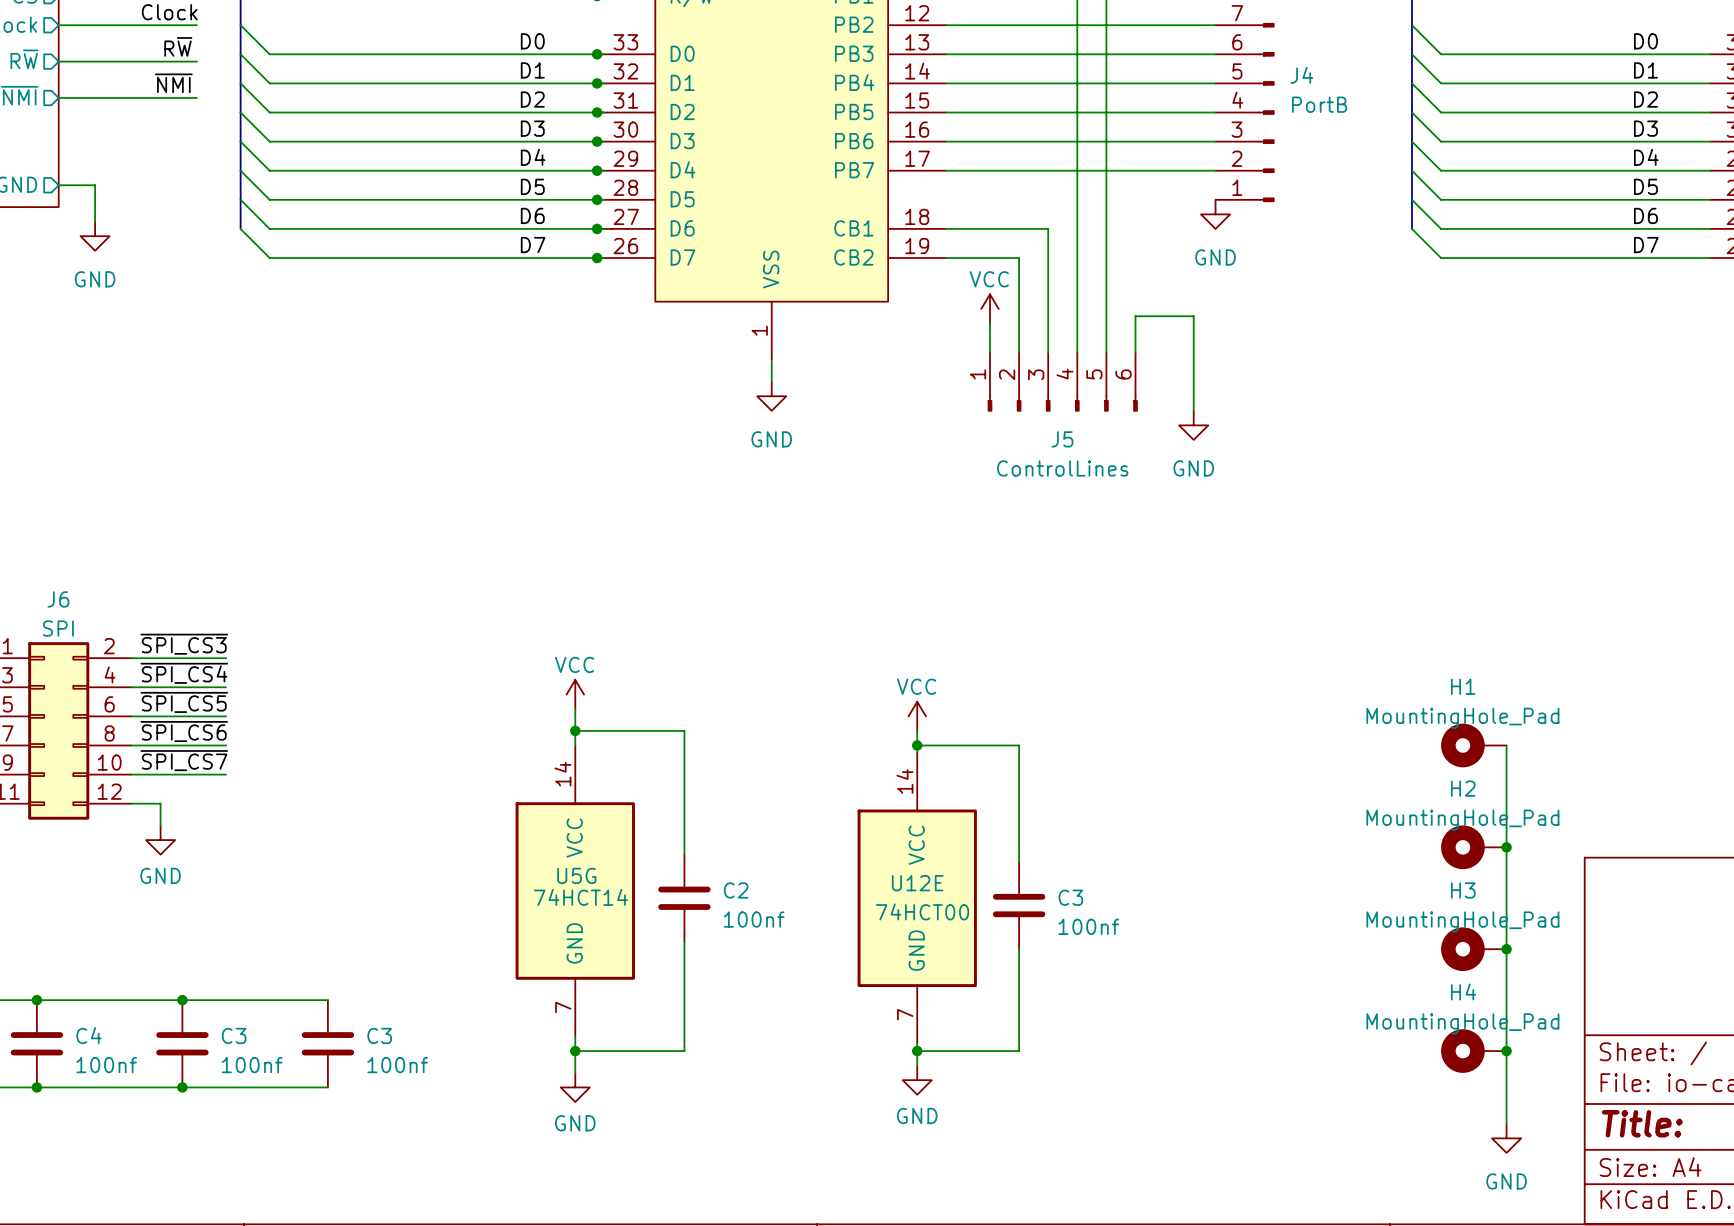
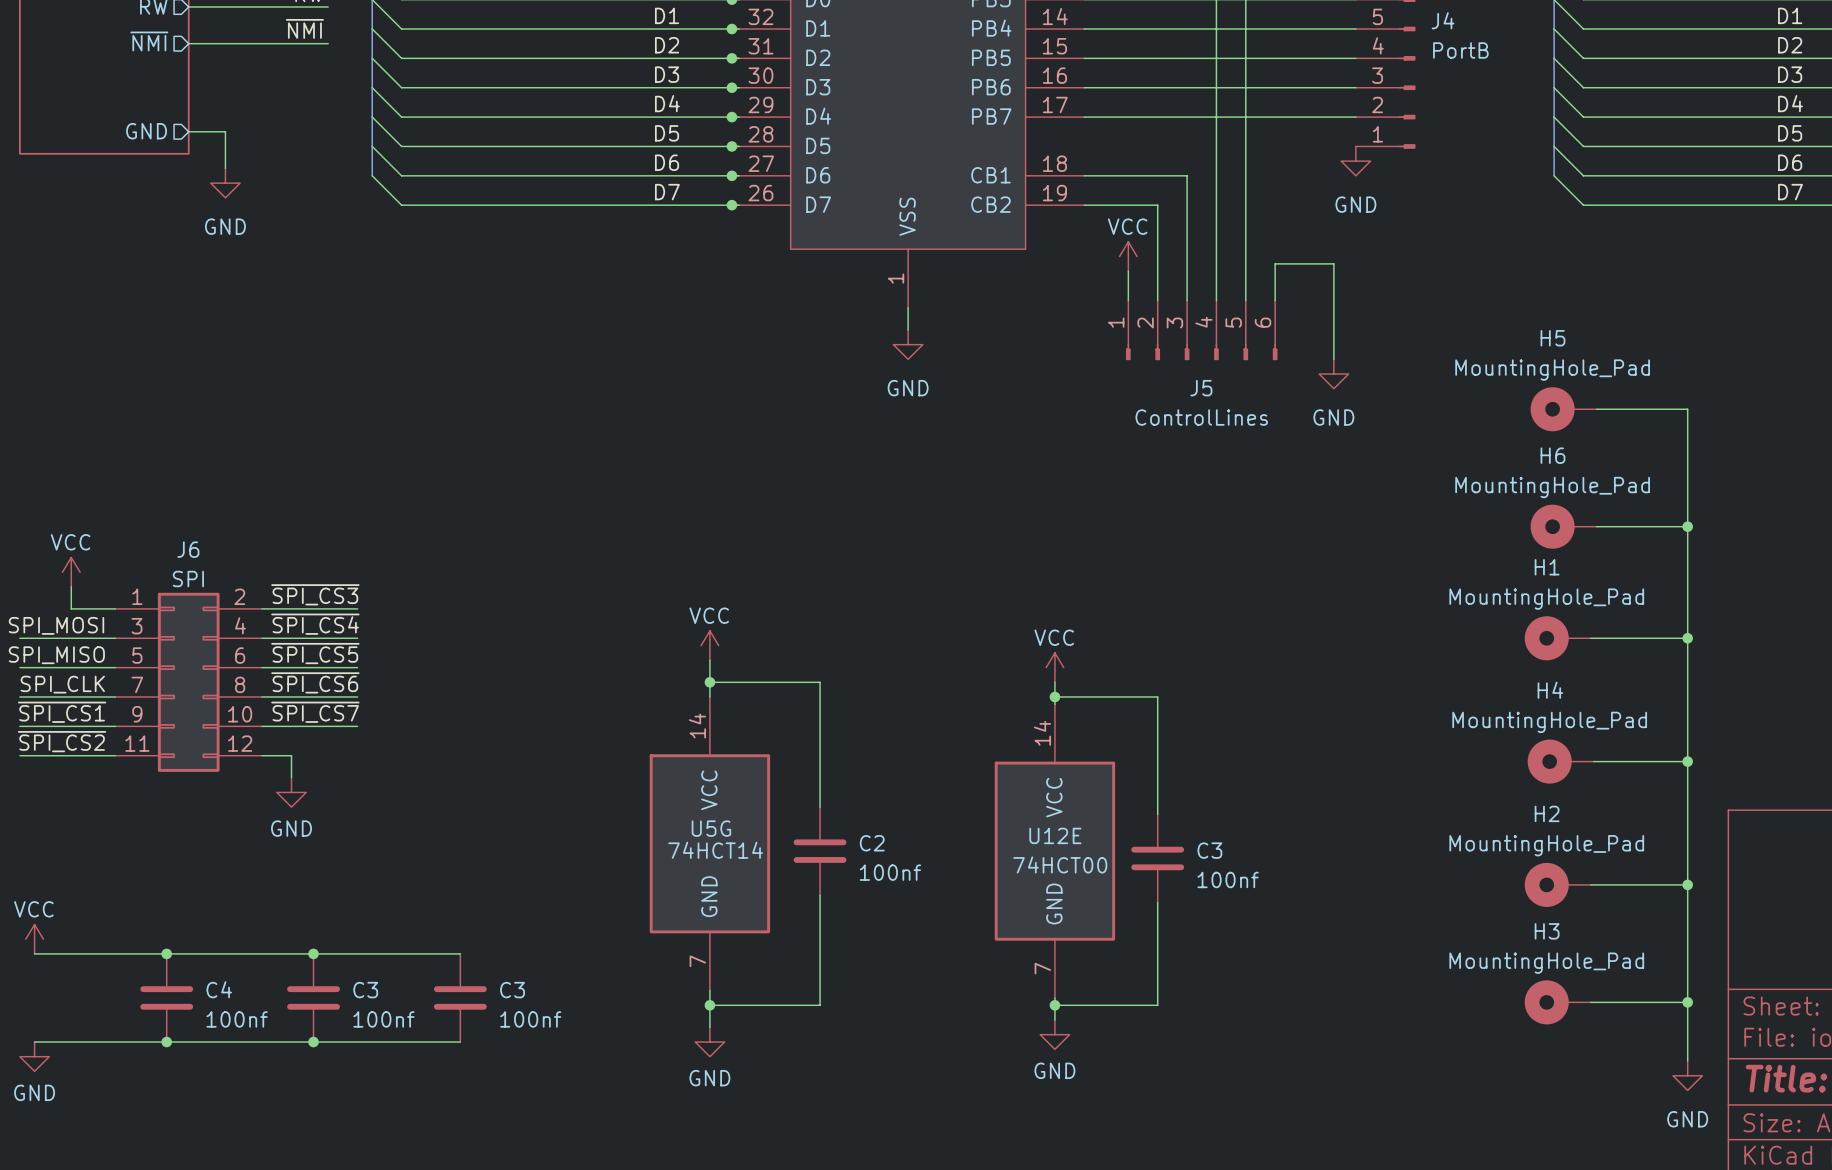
H5: none -> MountingHole_Pad (1563, 409)
wire: none -> (1596, 409) (1687, 409) (1687, 1061)
H6: none -> MountingHole_Pad (1563, 526)
wire: none -> (1596, 526) (1687, 526)
junction: none -> (1687, 526)
H1 name position: H1 (1463, 686) -> H1 (1547, 567)
wire: none -> (1590, 638) (1687, 638)
junction: none -> (1687, 638)
H1 value position: MountingHole_Pad (1462, 718) -> MountingHole_Pad (1546, 599)
H1 position: (1473, 745) -> (1557, 638)
wire: (1506, 745) (1506, 1123) -> none
H2 name position: H2 (1463, 788) -> H2 (1547, 813)
wire: none -> (1593, 761) (1687, 761)
junction: none -> (1687, 761)
H2 value position: MountingHole_Pad (1462, 820) -> MountingHole_Pad (1546, 845)
H2 position: (1473, 847) -> (1557, 884)
junction: (1506, 847) -> none
H3 name position: H3 (1463, 890) -> H3 (1547, 931)
H3 value position: MountingHole_Pad (1462, 921) -> MountingHole_Pad (1546, 963)
wire: none -> (1590, 884) (1687, 884)
H3 position: (1473, 949) -> (1557, 1002)
junction position: (1506, 949) -> (1687, 884)
H4 name position: H4 (1463, 991) -> H4 (1550, 690)
H4 value position: MountingHole_Pad (1462, 1023) -> MountingHole_Pad (1549, 722)
wire: none -> (1590, 1002) (1687, 1002)
H4 position: (1473, 1051) -> (1560, 761)
junction position: (1506, 1051) -> (1687, 1002)
power symbol position: GND (1506, 1138) -> GND (1687, 1075)

